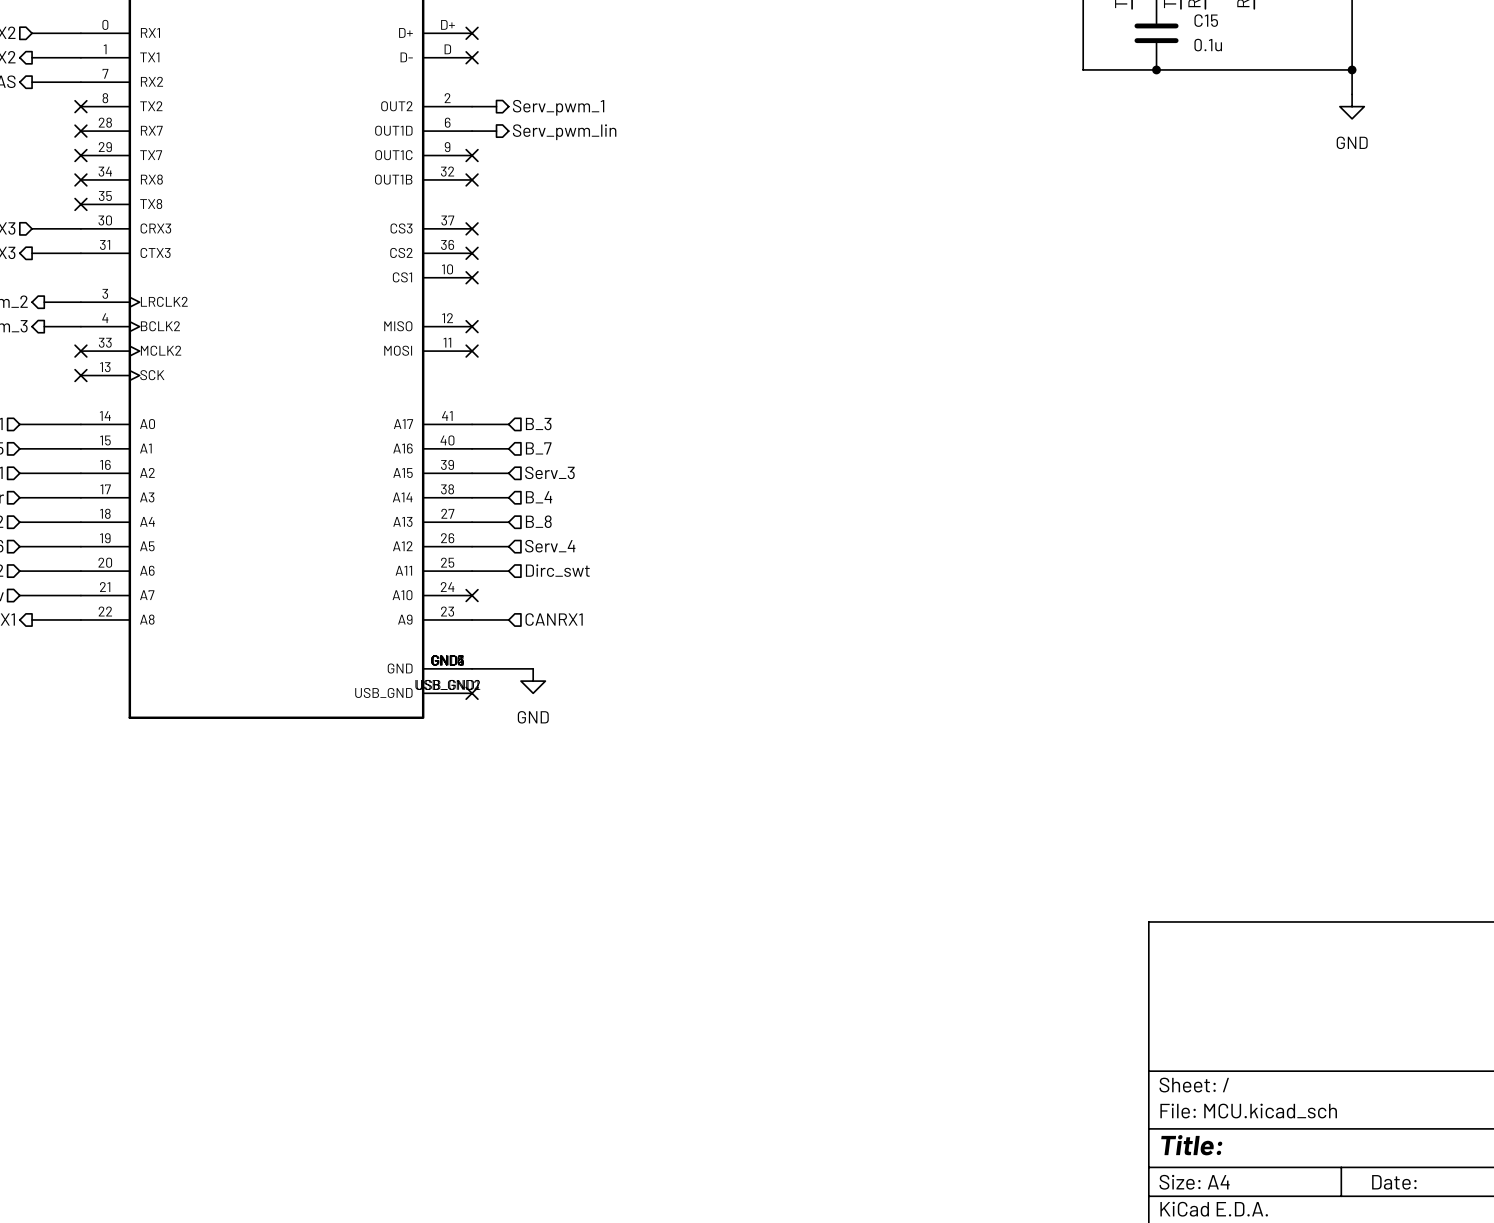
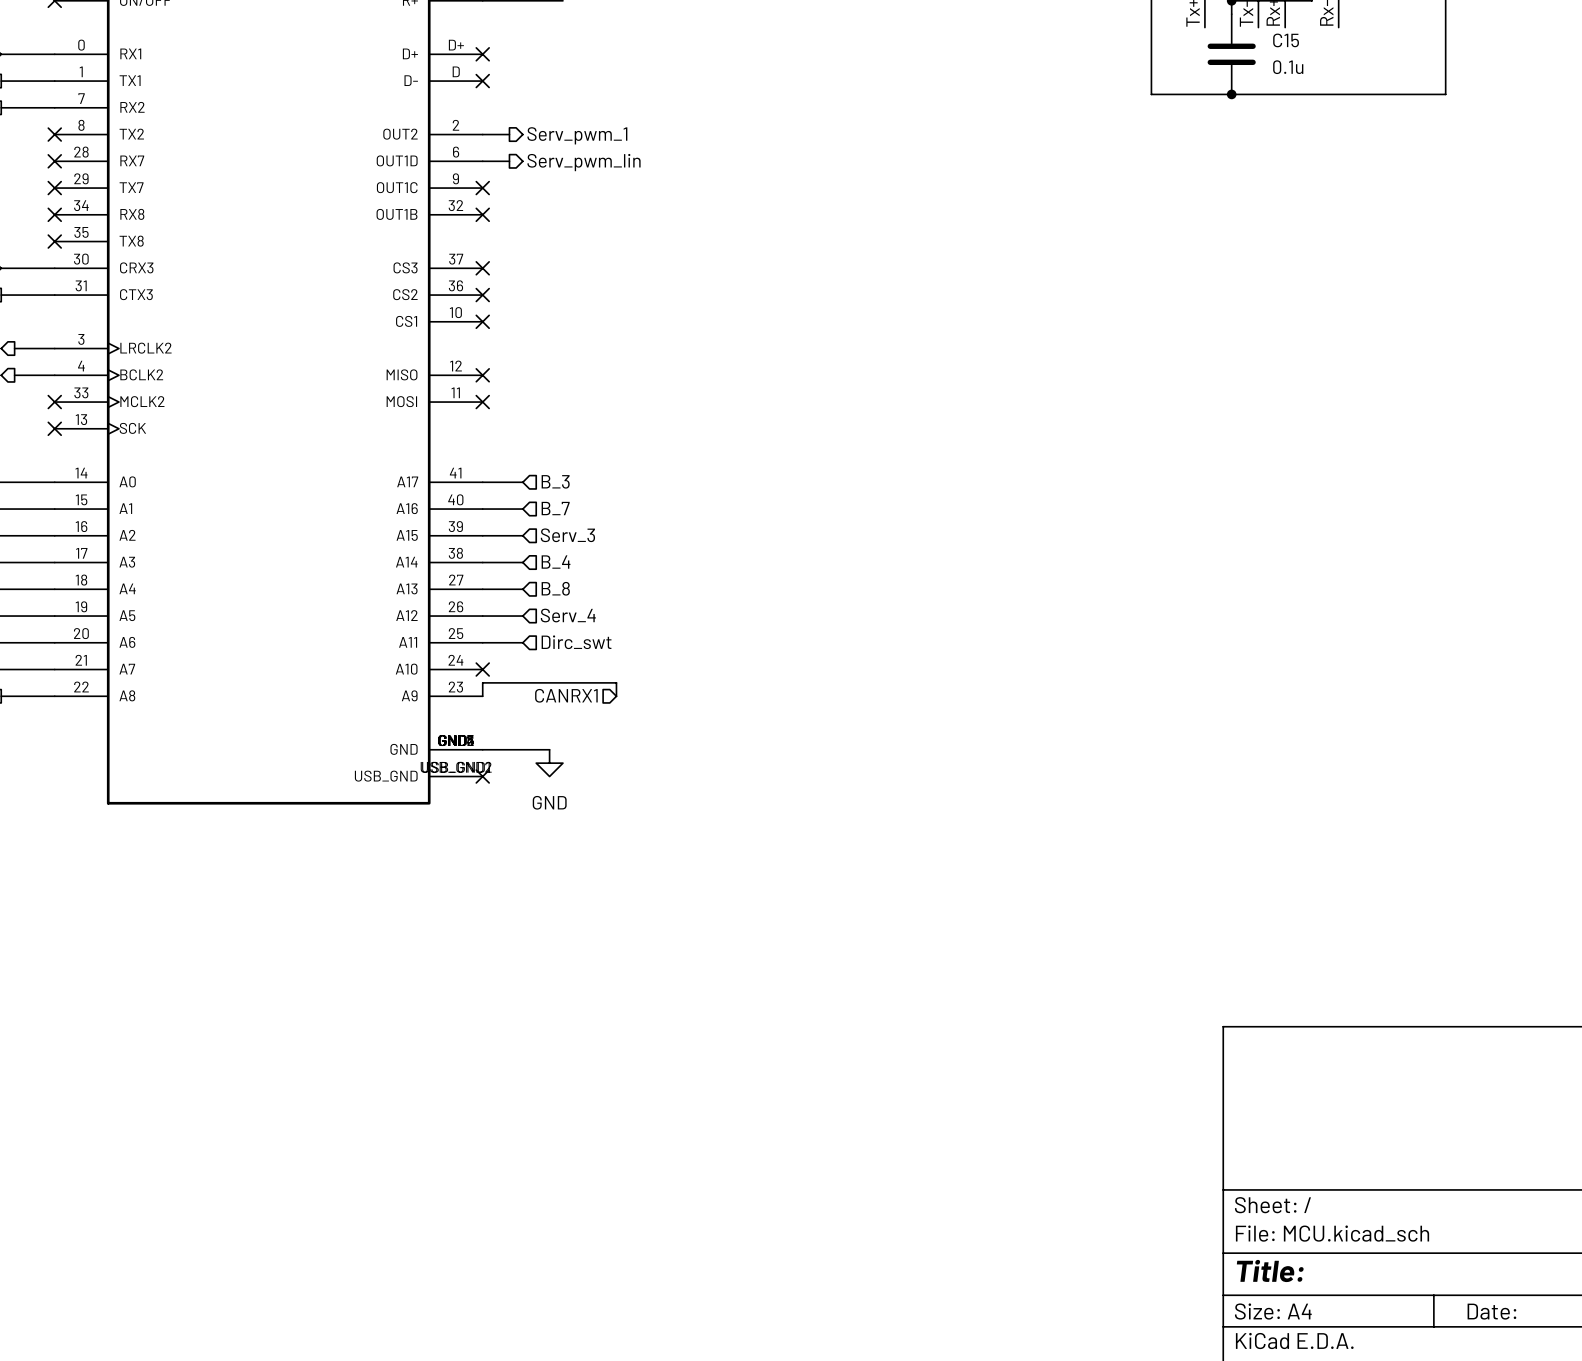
wire: (1352, 69) (1352, 94) -> none
junction: (1352, 69) -> none
power symbol: GND (1352, 106) -> none
wire: (472, 619) (508, 619) -> (482, 696) (482, 682) (616, 682) (616, 696)
hierarchical label rotation: 0° (554, 619) -> 180° (566, 695)

